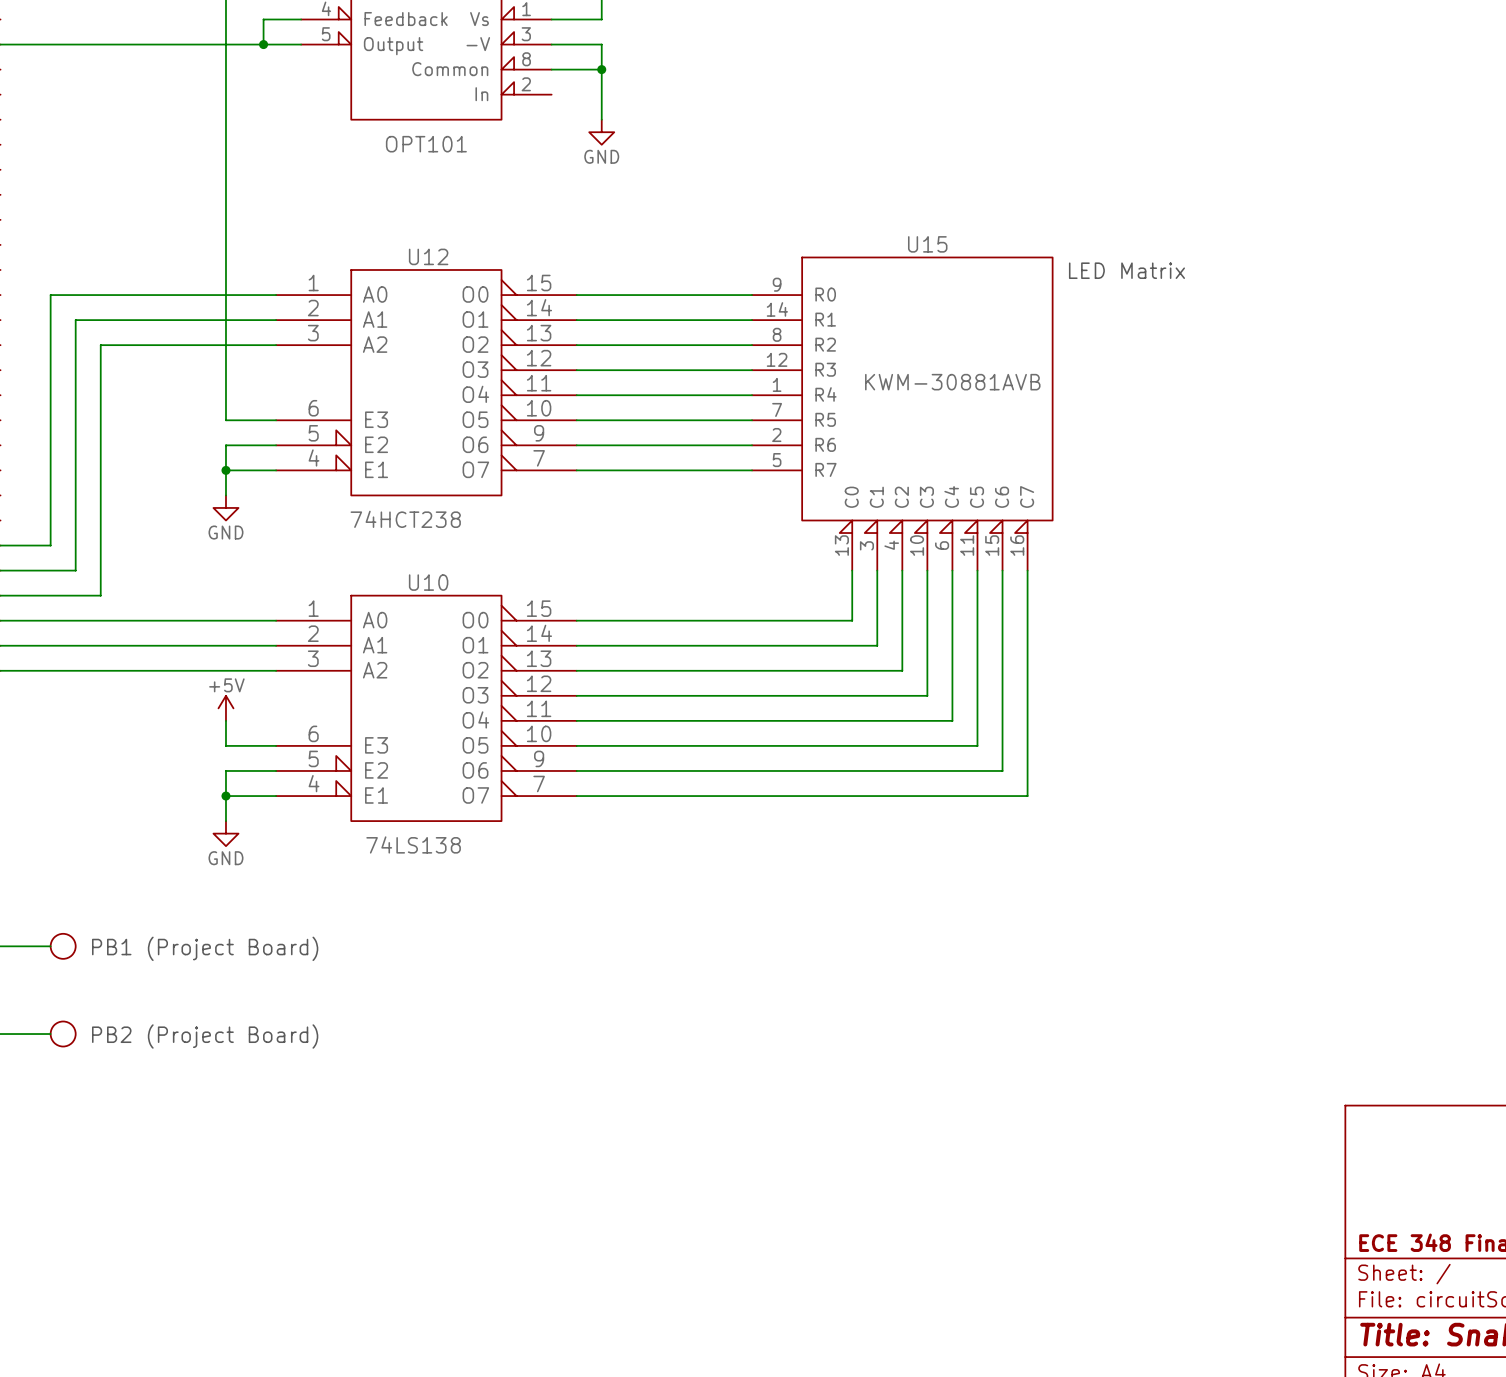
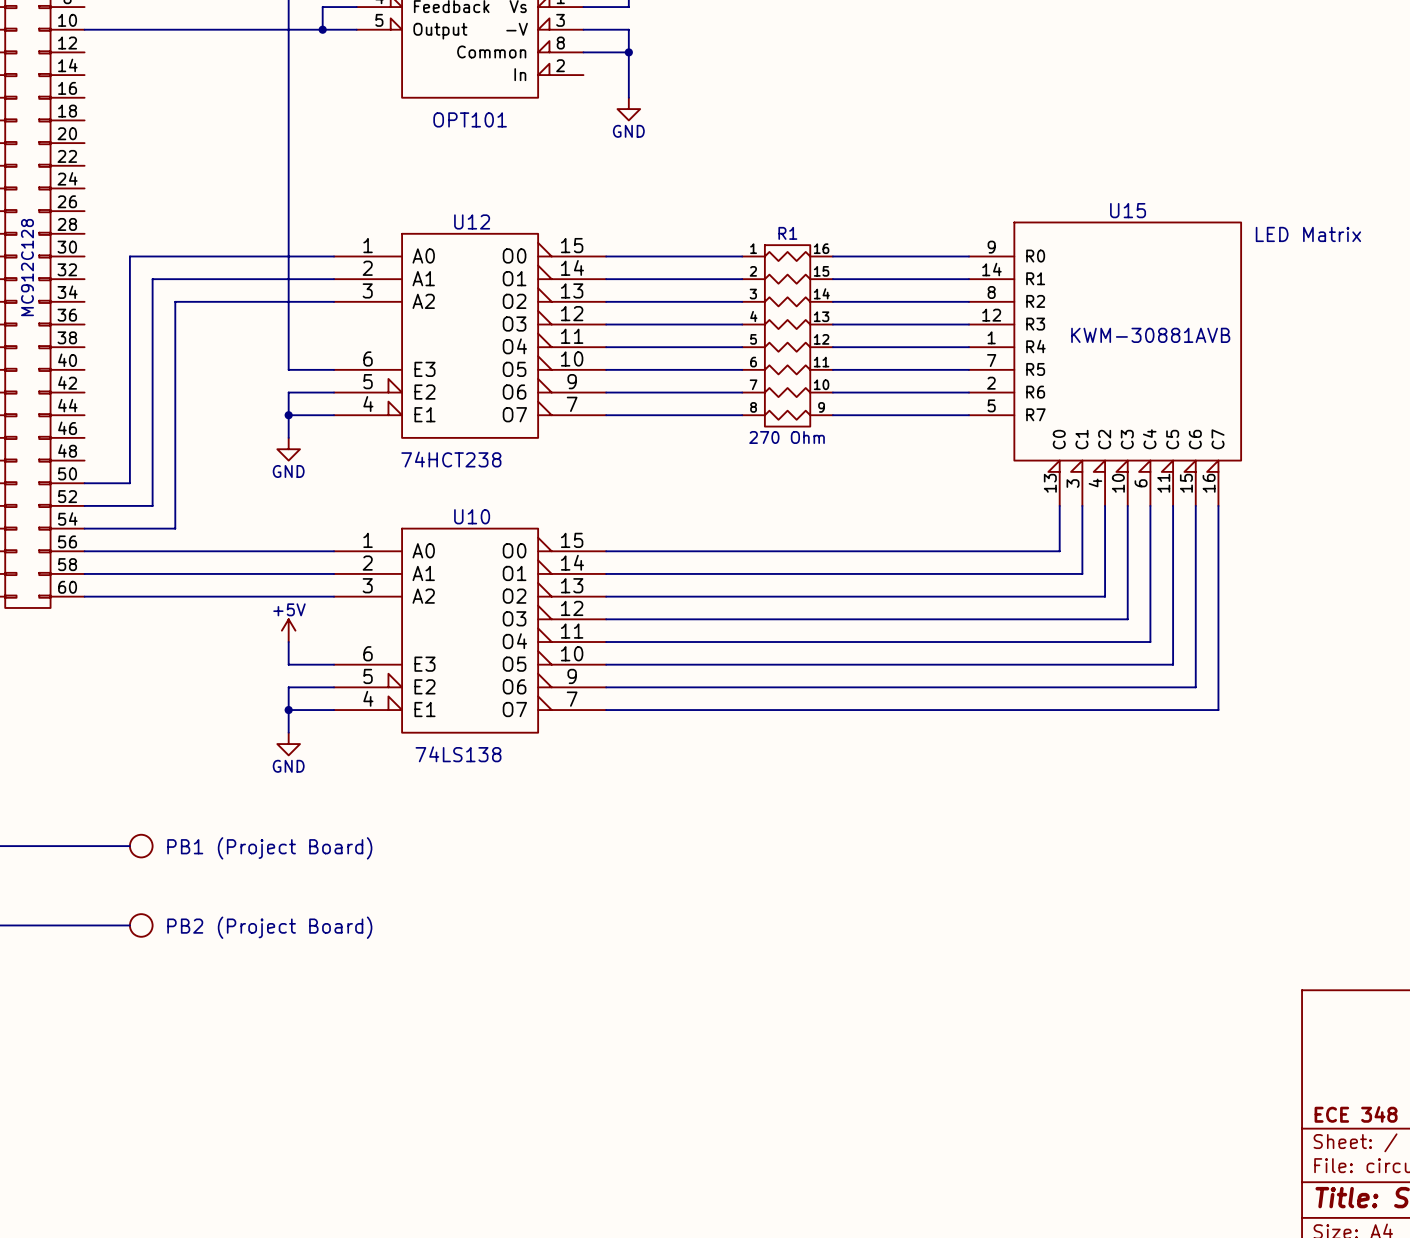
text position: LED Matrix (1126, 270) -> LED Matrix (1308, 234)
wire: none -> (832, 256) (968, 256)
wire: none -> (832, 279) (968, 279)
wire: none -> (832, 301) (968, 301)
wire: none -> (832, 324) (968, 324)
R1: none -> 270 Ohm (787, 335)
wire: none -> (832, 347) (968, 347)
U15 position: (902, 414) -> (1105, 364)
wire: none -> (832, 369) (968, 369)
wire: none -> (832, 392) (968, 392)
wire: none -> (832, 415) (968, 415)
wire: (852, 570) (852, 620) -> (1059, 505) (1059, 551) (855, 551)
wire: (877, 570) (877, 645) -> (1082, 505) (1082, 573) (878, 573)
wire: (902, 570) (902, 670) -> (1105, 505) (1105, 596) (900, 596)
wire: (927, 570) (927, 695) -> (1127, 505) (1127, 619) (923, 619)
wire: (952, 570) (952, 720) -> (1150, 505) (1150, 642) (946, 642)
wire: (977, 570) (977, 745) -> (1173, 505) (1173, 664) (968, 664)
wire: (1002, 570) (1002, 770) -> (1195, 505) (1195, 687) (991, 687)
wire: (1027, 570) (1027, 796) -> (1218, 505) (1218, 710) (1014, 710)

